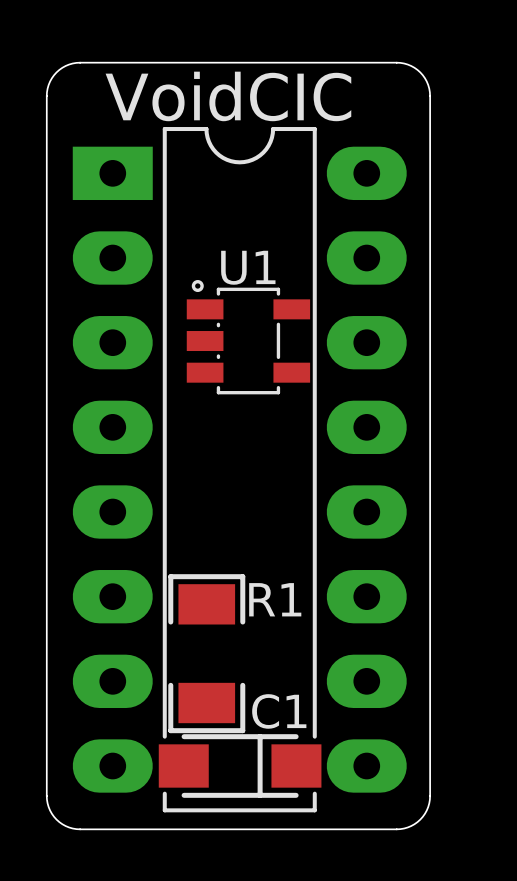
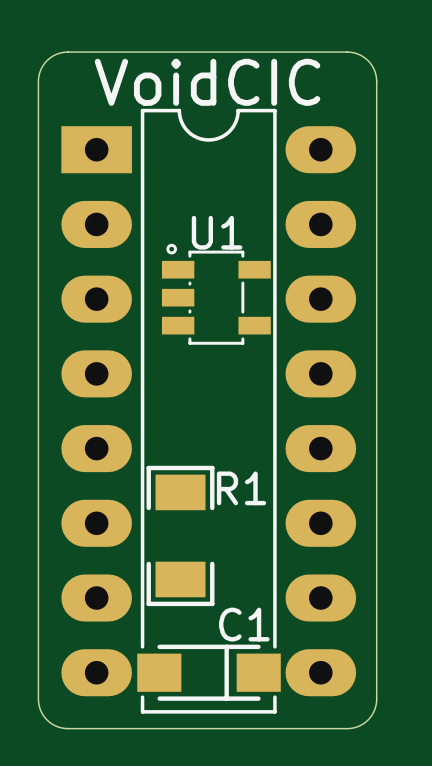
R1 position: (206, 653) -> (180, 535)

